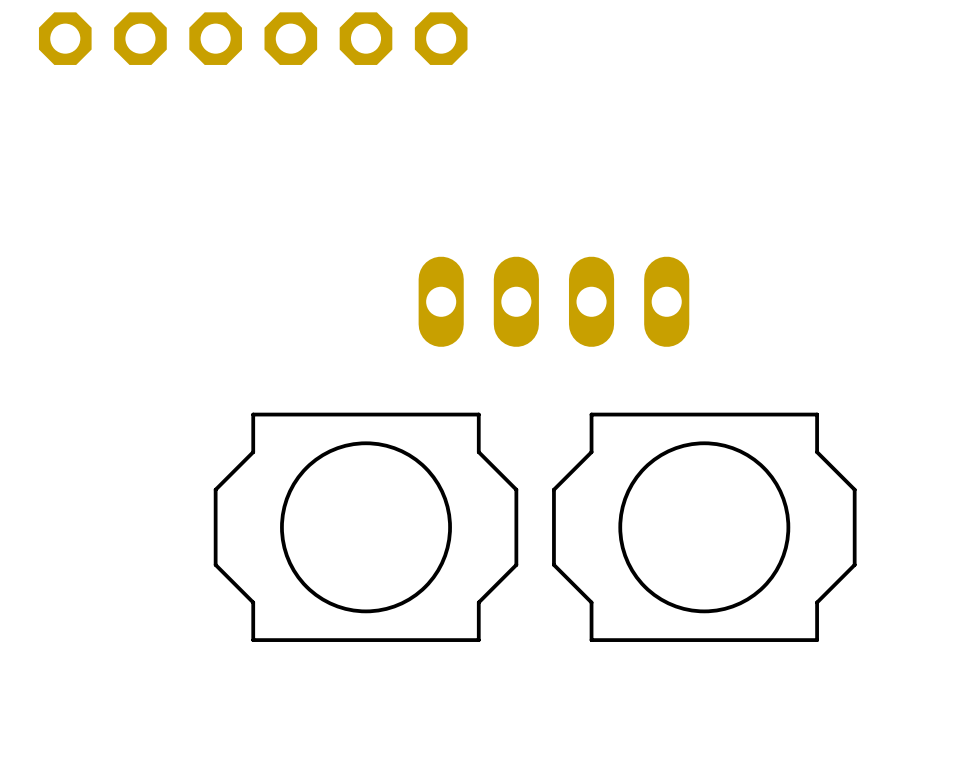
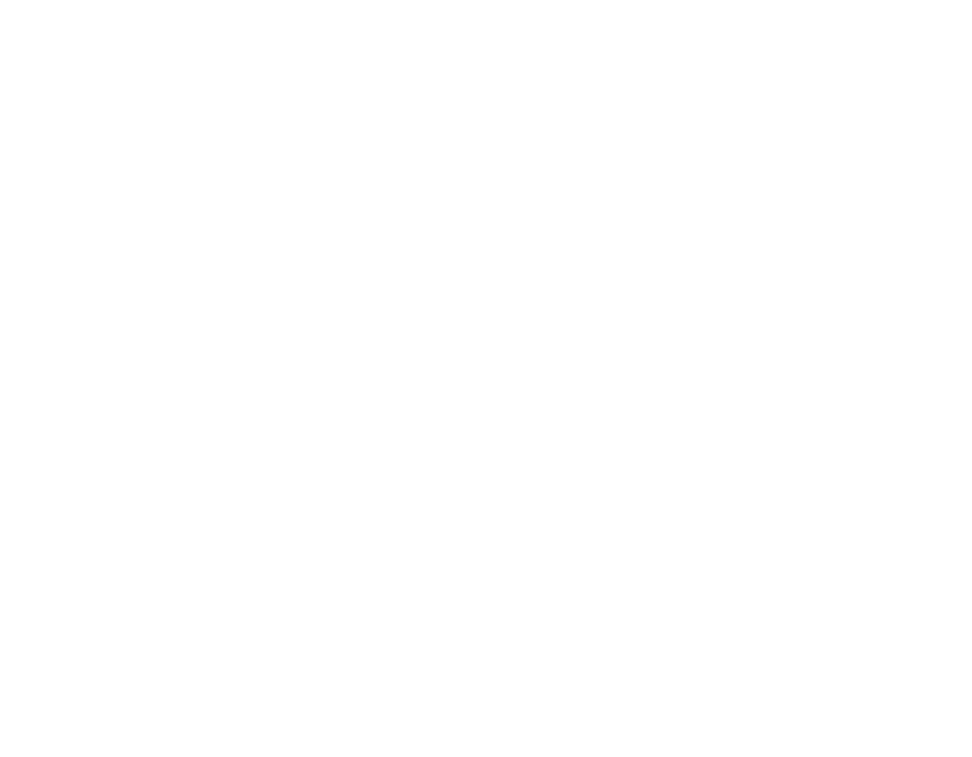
part: (253, 38) -> none
part: (553, 301) -> none
part: (366, 527) -> none
part: (704, 527) -> none

